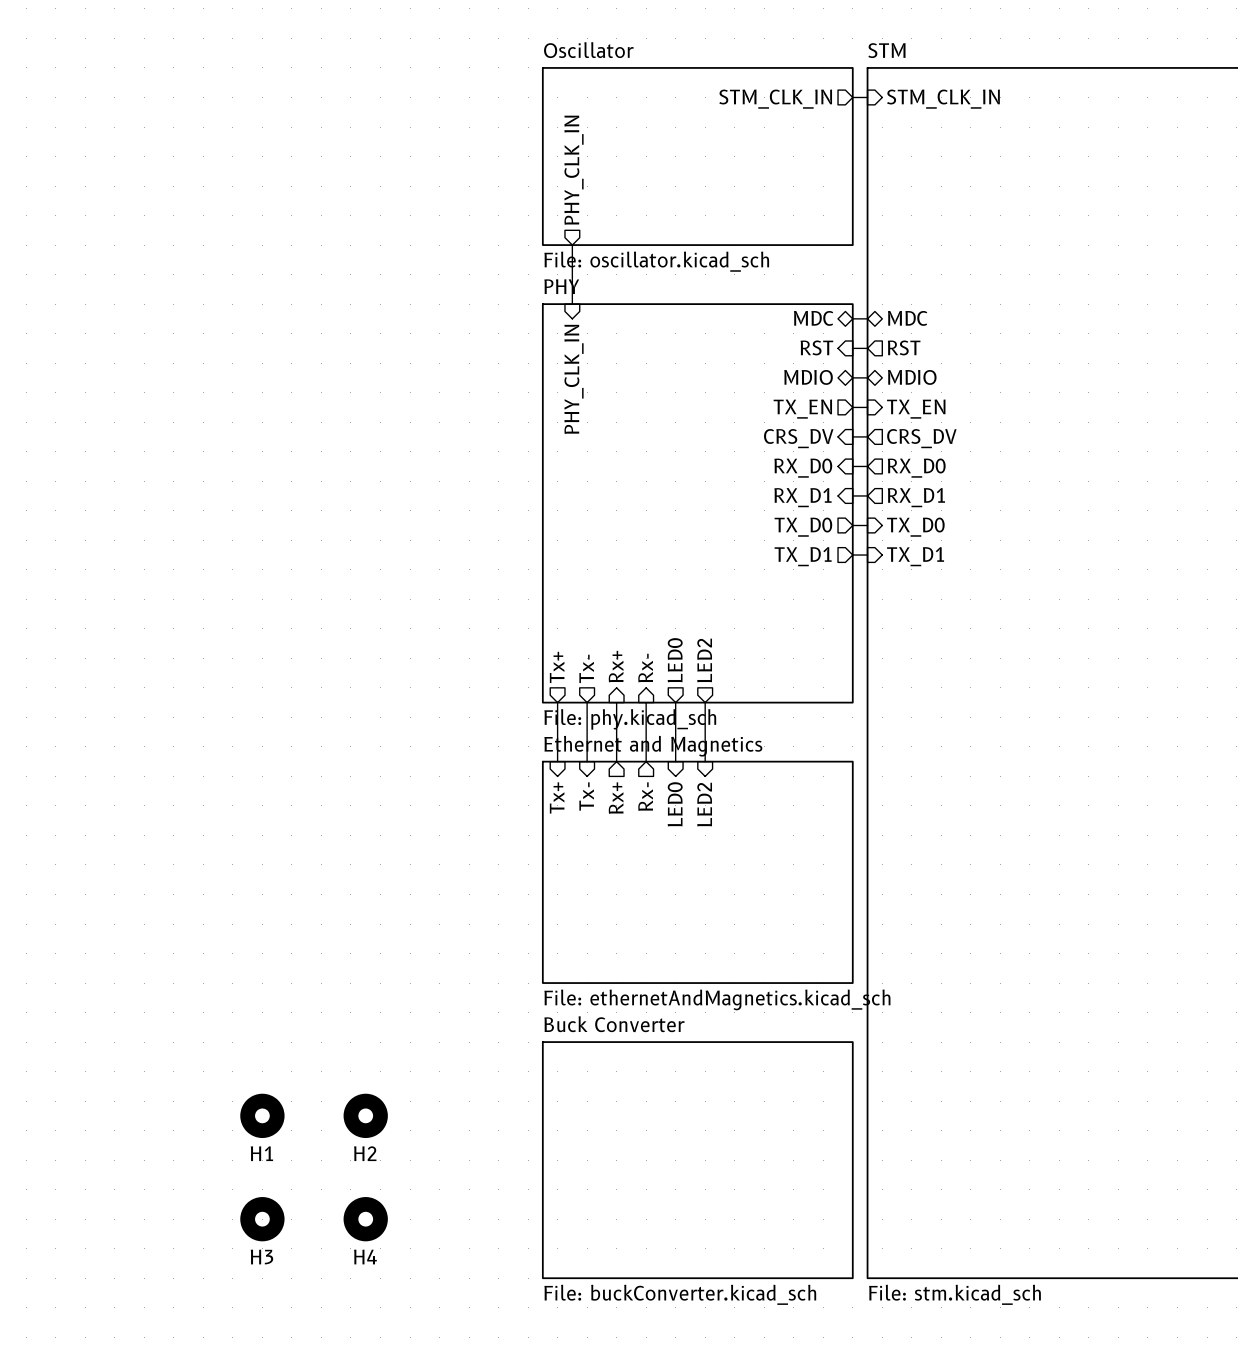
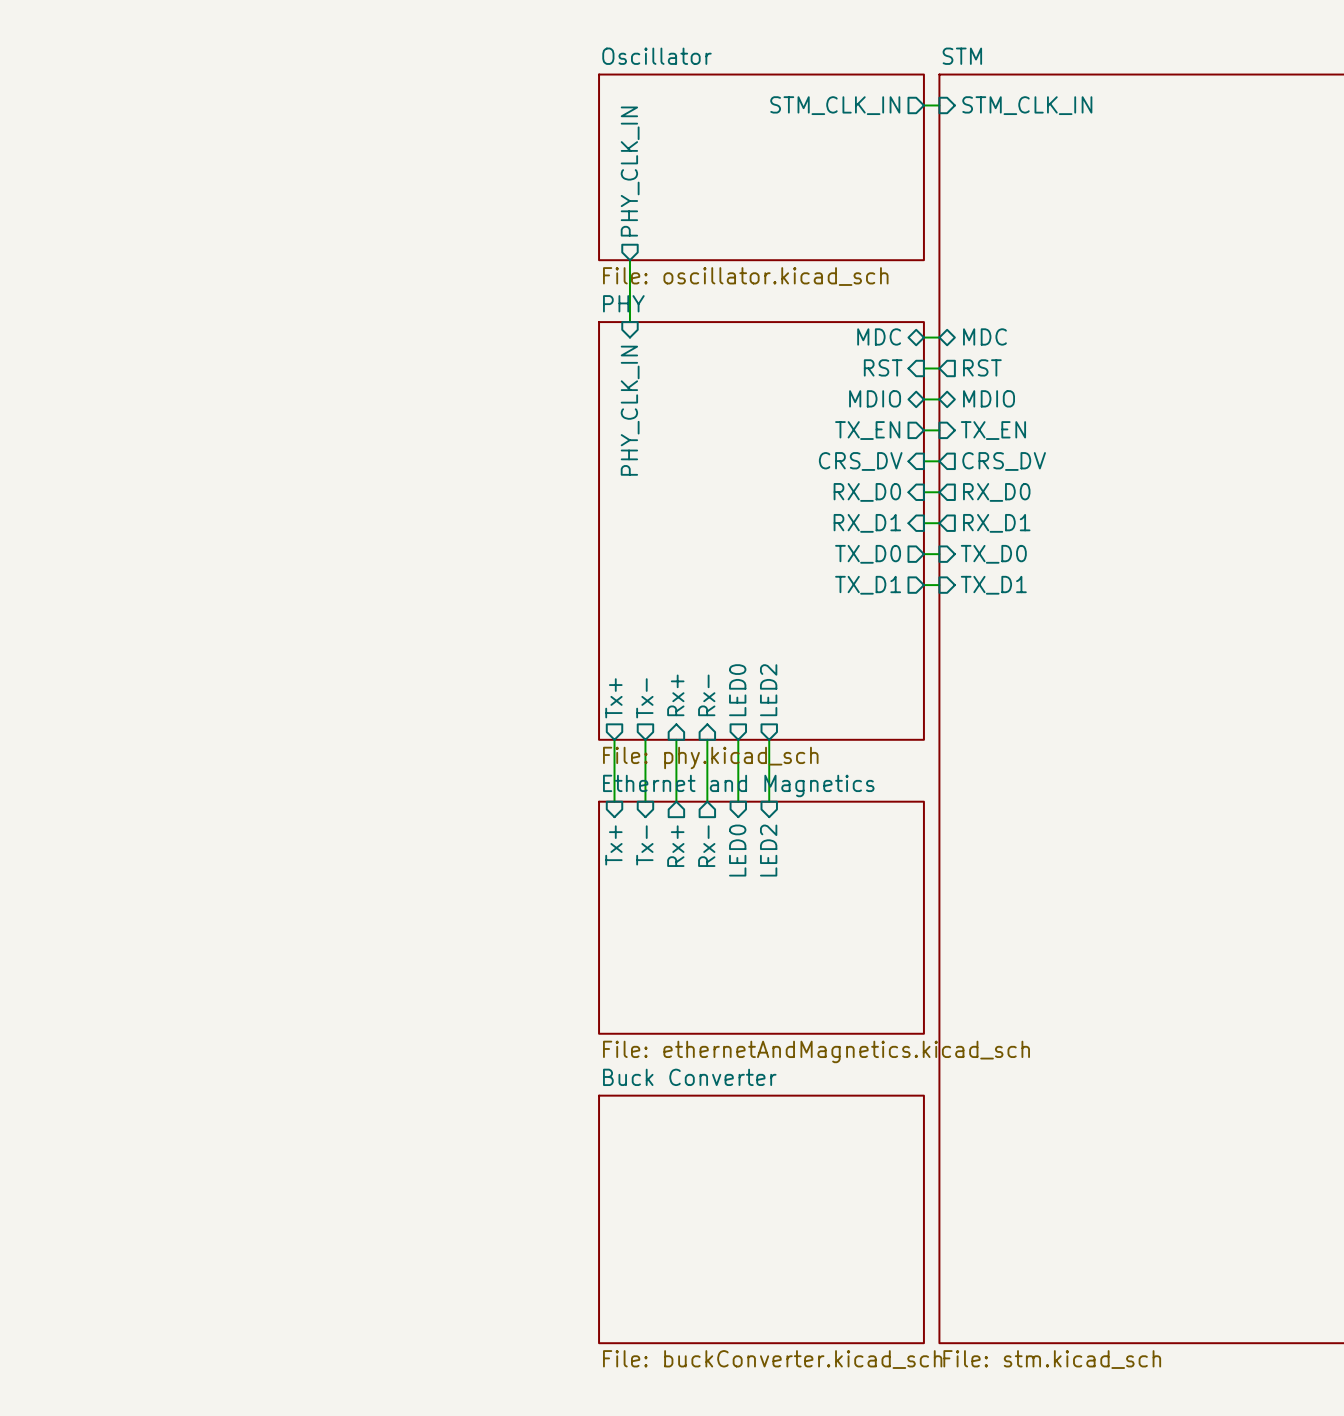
H1: (262, 1115) -> none
H2: (365, 1115) -> none
H3: (262, 1219) -> none
H4: (365, 1219) -> none

